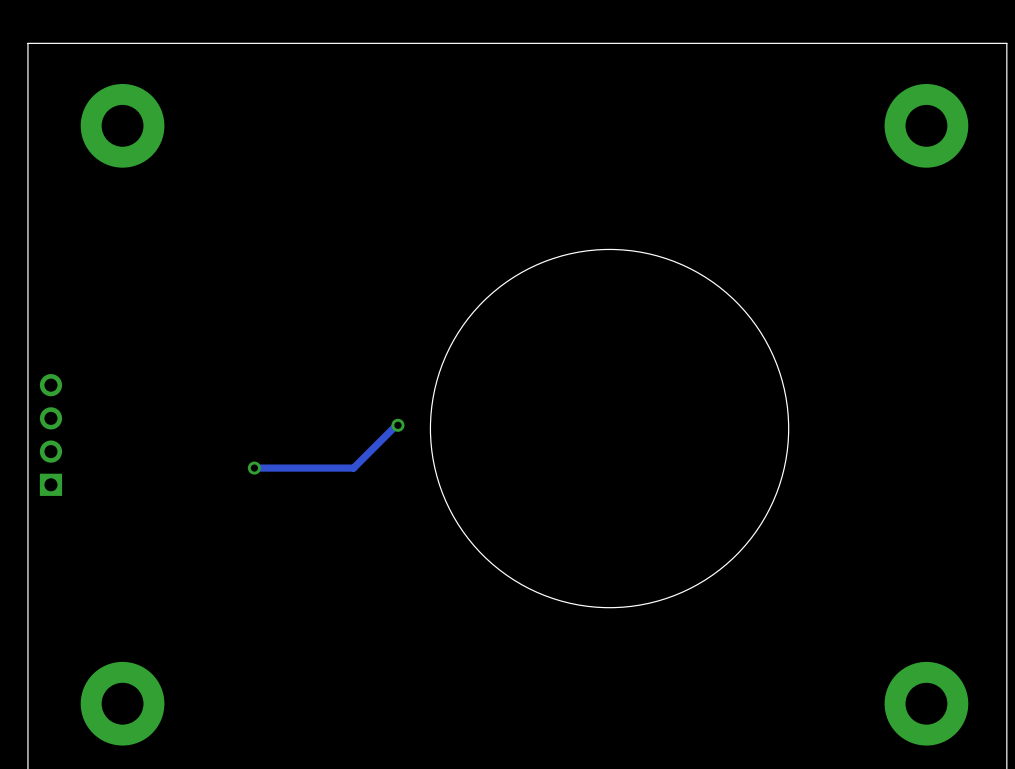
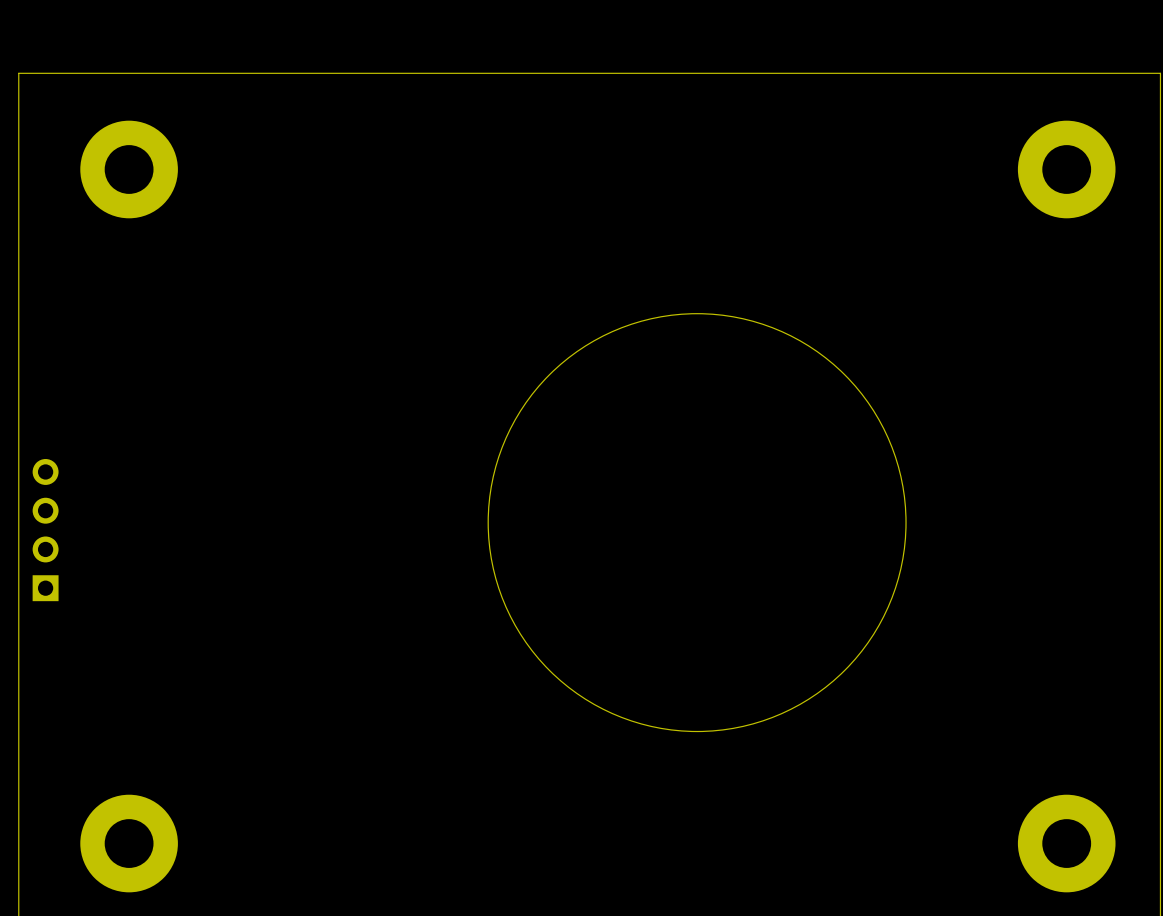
part: (326, 446) -> none

